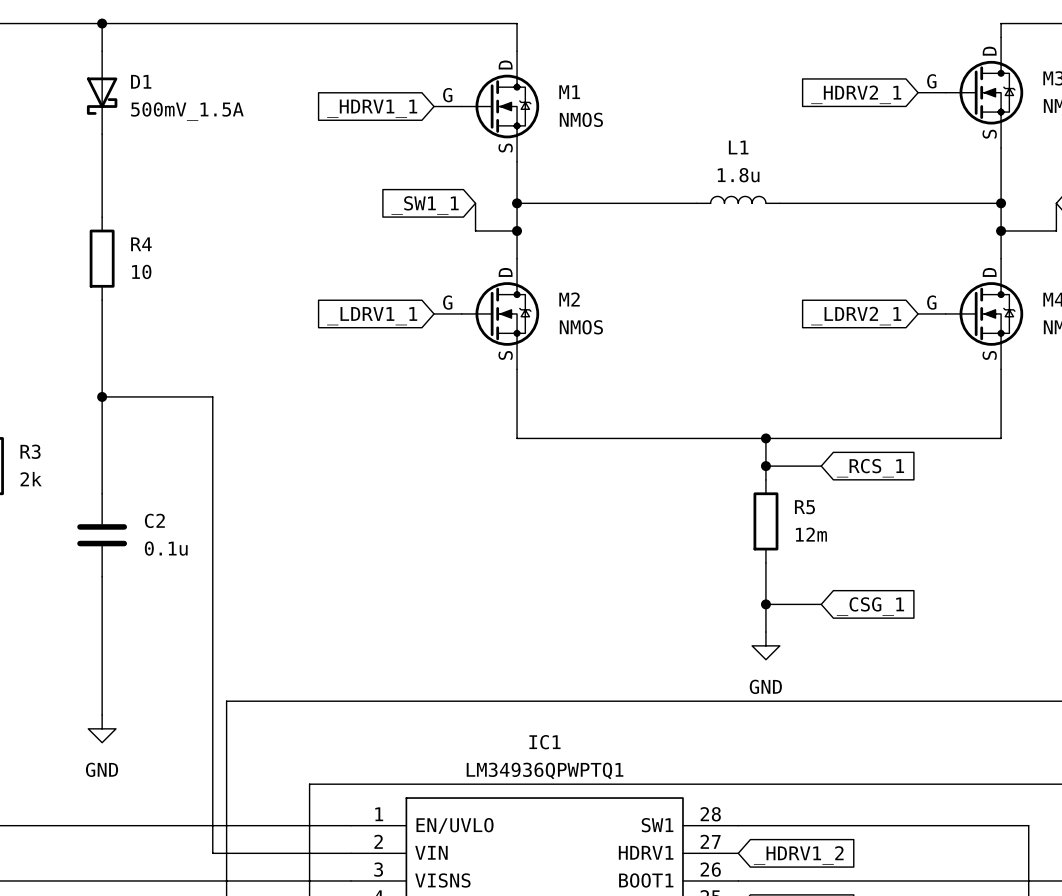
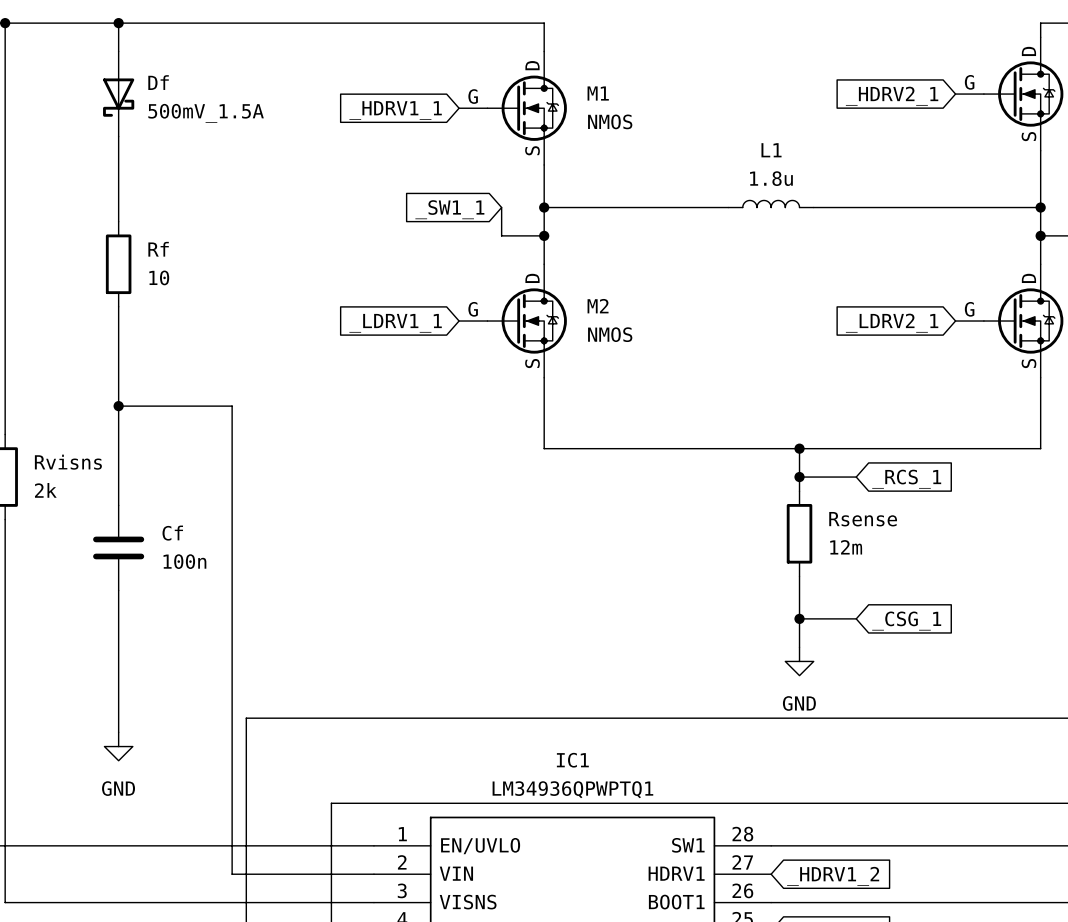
D1 name: D1 (141, 81) -> Df (158, 82)
R4 name: R4 (141, 244) -> Rf (158, 249)
R3 name: R3 (30, 451) -> Rvisns (68, 462)
R5 name: R5 (804, 507) -> Rsense (863, 519)
C2 name: C2 (154, 520) -> Cf (172, 533)
C2 value: 0.1u (166, 548) -> 100n (184, 561)

